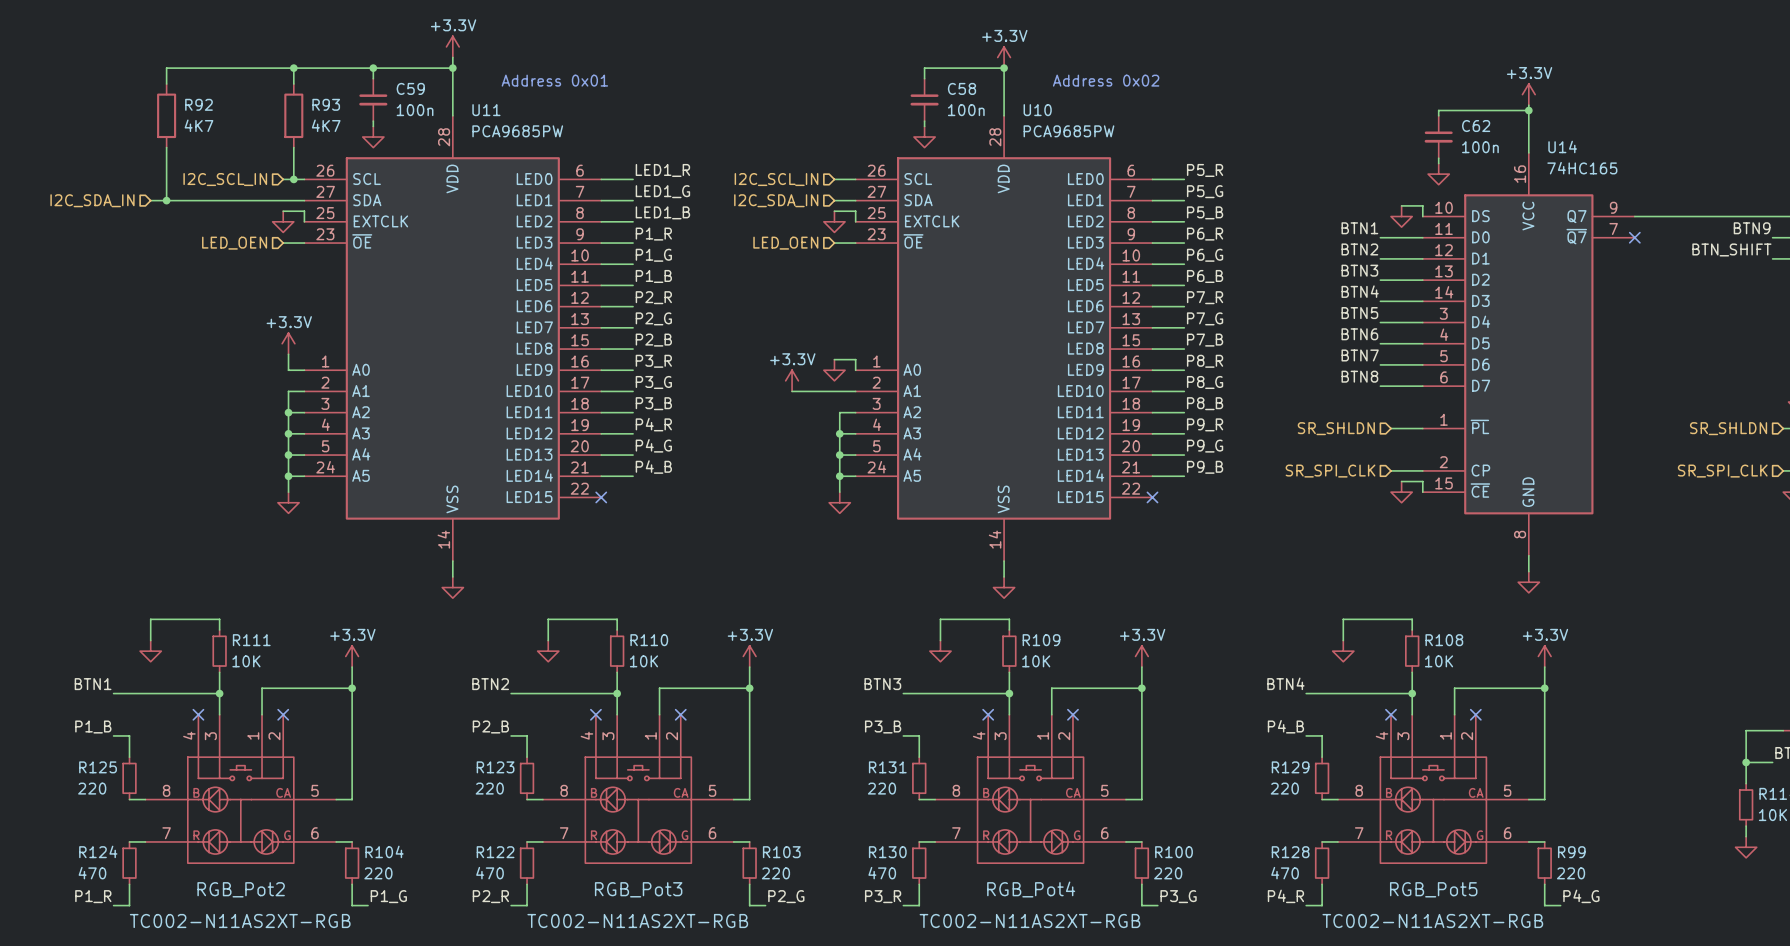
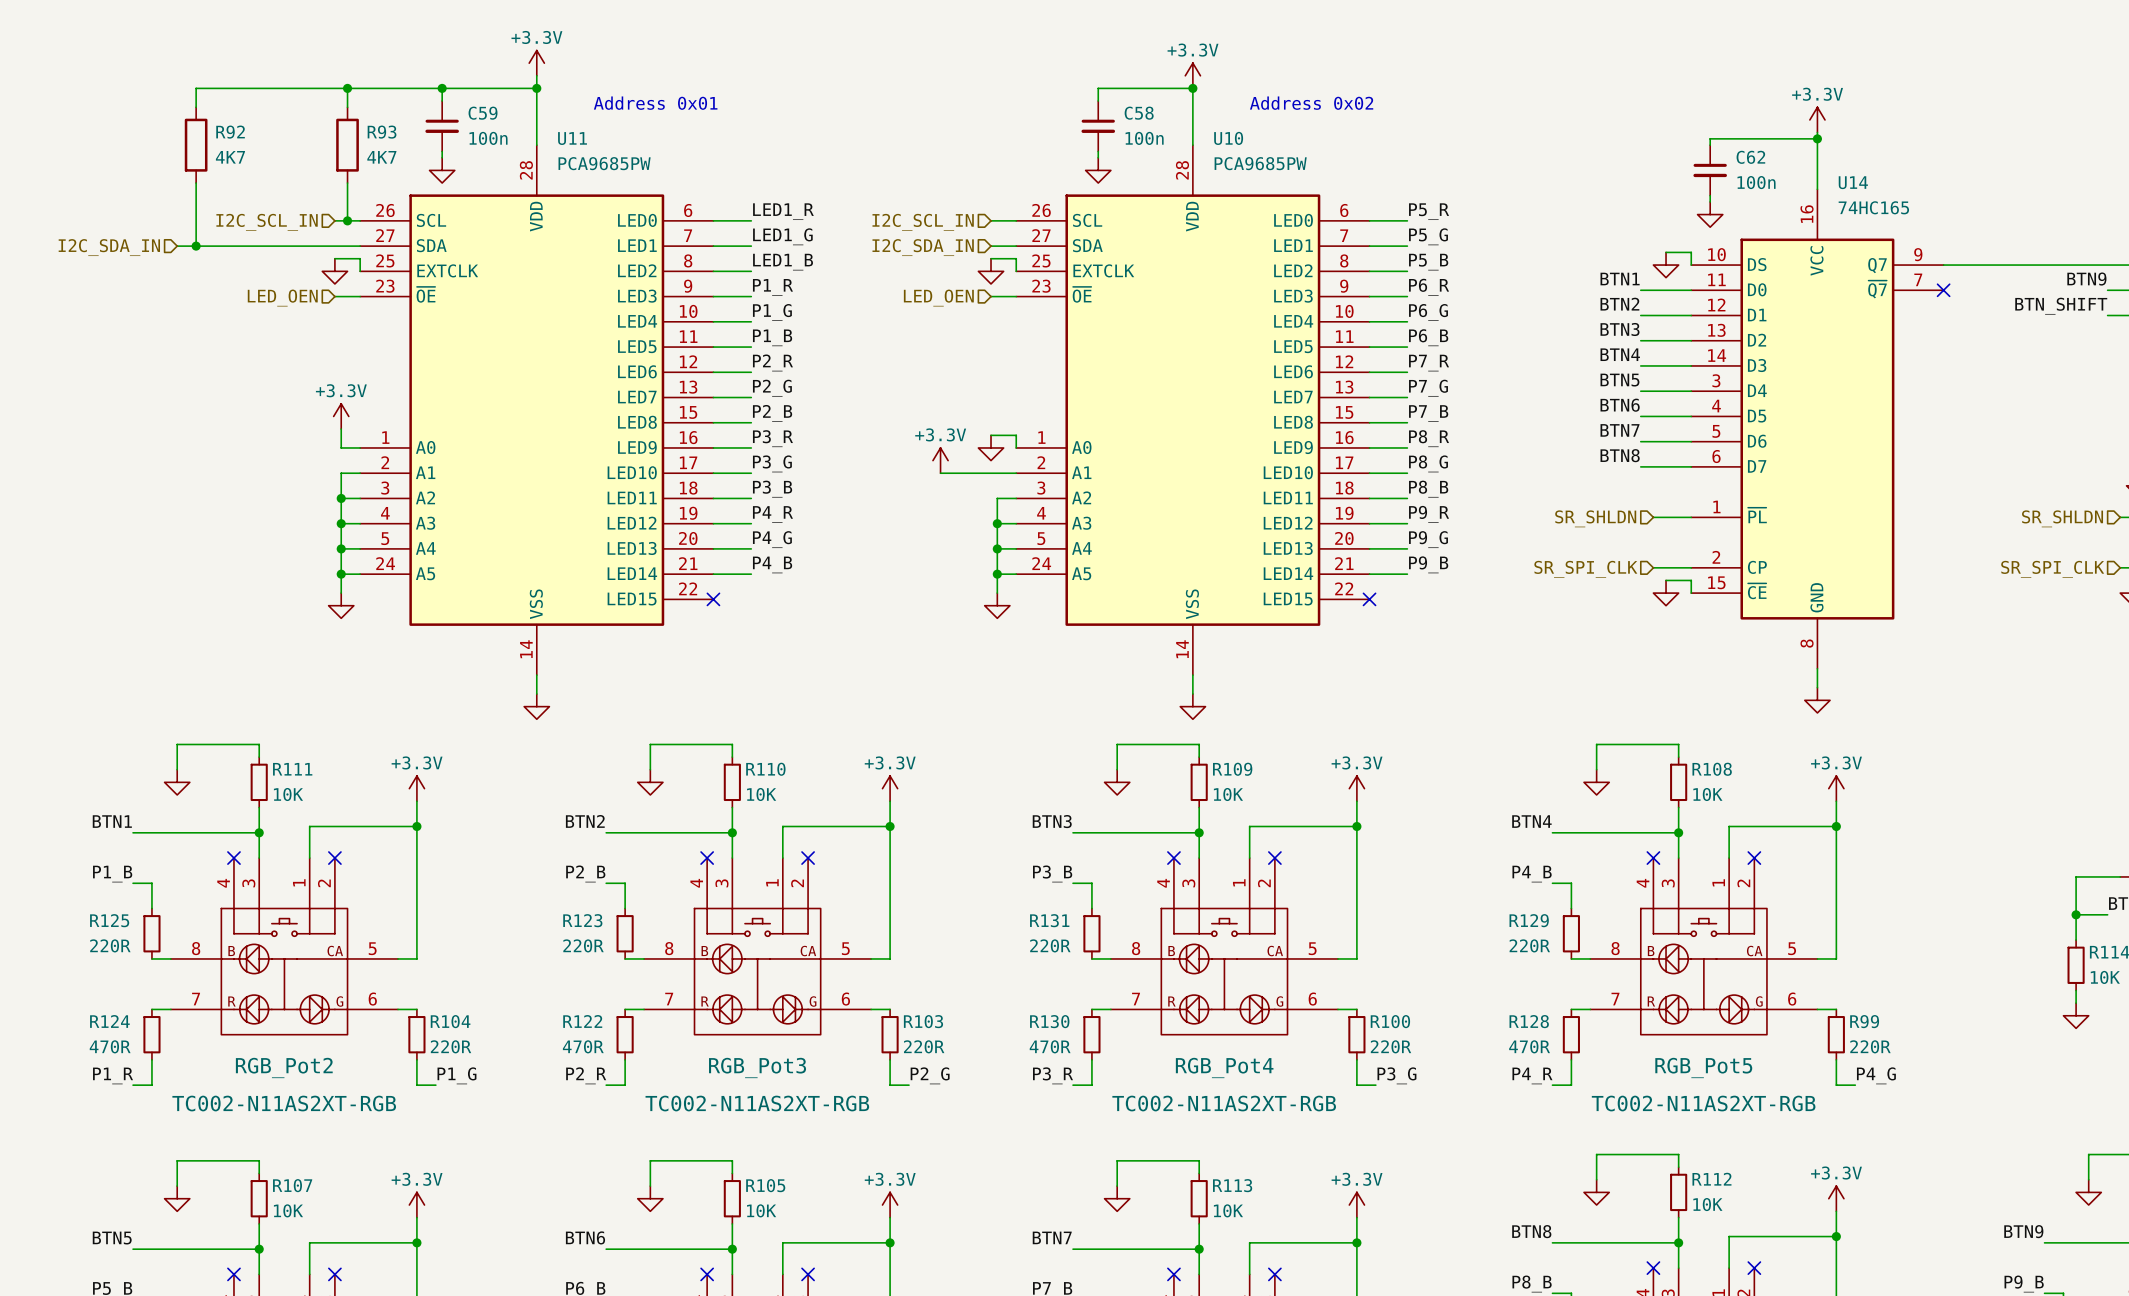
R125 value: 220 (92, 788) -> 220R (110, 945)
R123 value: 220 (489, 788) -> 220R (583, 945)
R131 value: 220 (881, 788) -> 220R (1050, 945)
R129 value: 220 (1284, 788) -> 220R (1529, 945)
R124 value: 470 (92, 873) -> 470R (110, 1046)
R104 value: 220 (378, 873) -> 220R (451, 1046)
R122 value: 470 (490, 873) -> 470R (583, 1046)
R103 value: 220 (775, 873) -> 220R (924, 1046)
R130 value: 470 (882, 873) -> 470R (1050, 1046)
R100 value: 220 (1168, 873) -> 220R (1391, 1046)
R128 value: 470 (1285, 873) -> 470R (1529, 1046)
R99 value: 220 (1571, 873) -> 220R (1870, 1046)

